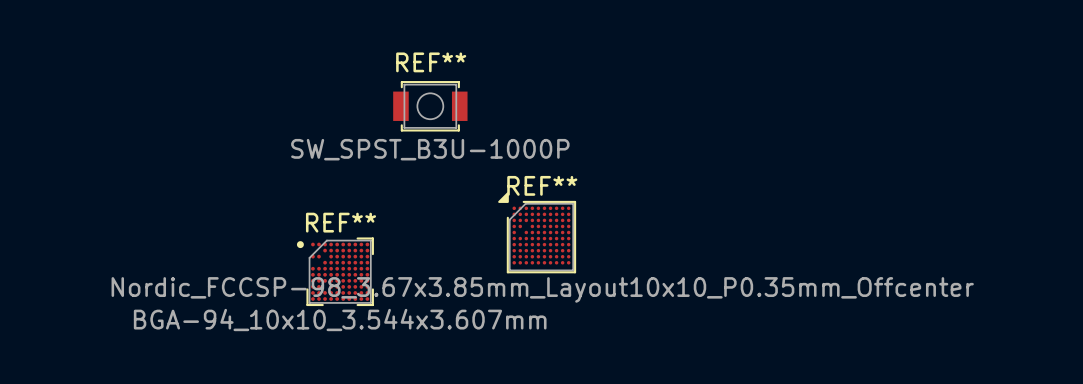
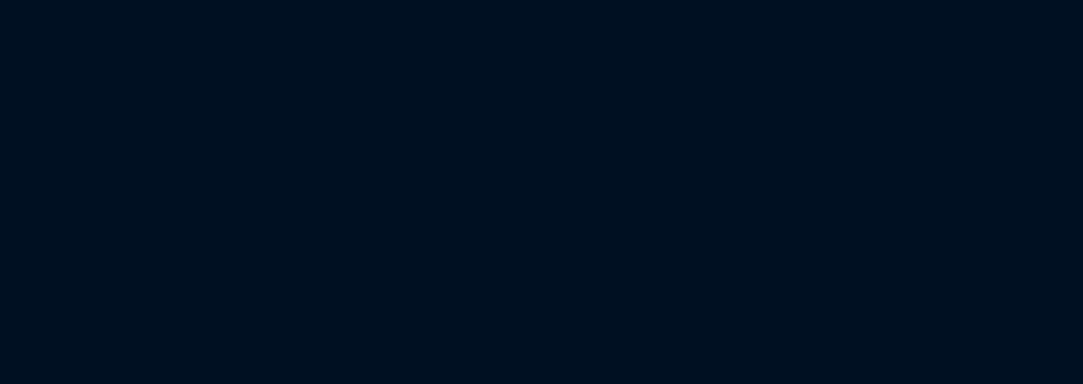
REF**: SW_SPST_B3U-1000P (430, 106) -> none
REF**: Nordic_FCCSP-98_3.67x3.85mm_Layout10x10_P0.35mm_Offcenter (537, 232) -> none
REF**: BGA-94_10x10_3.544x3.607mm (335, 271) -> none

